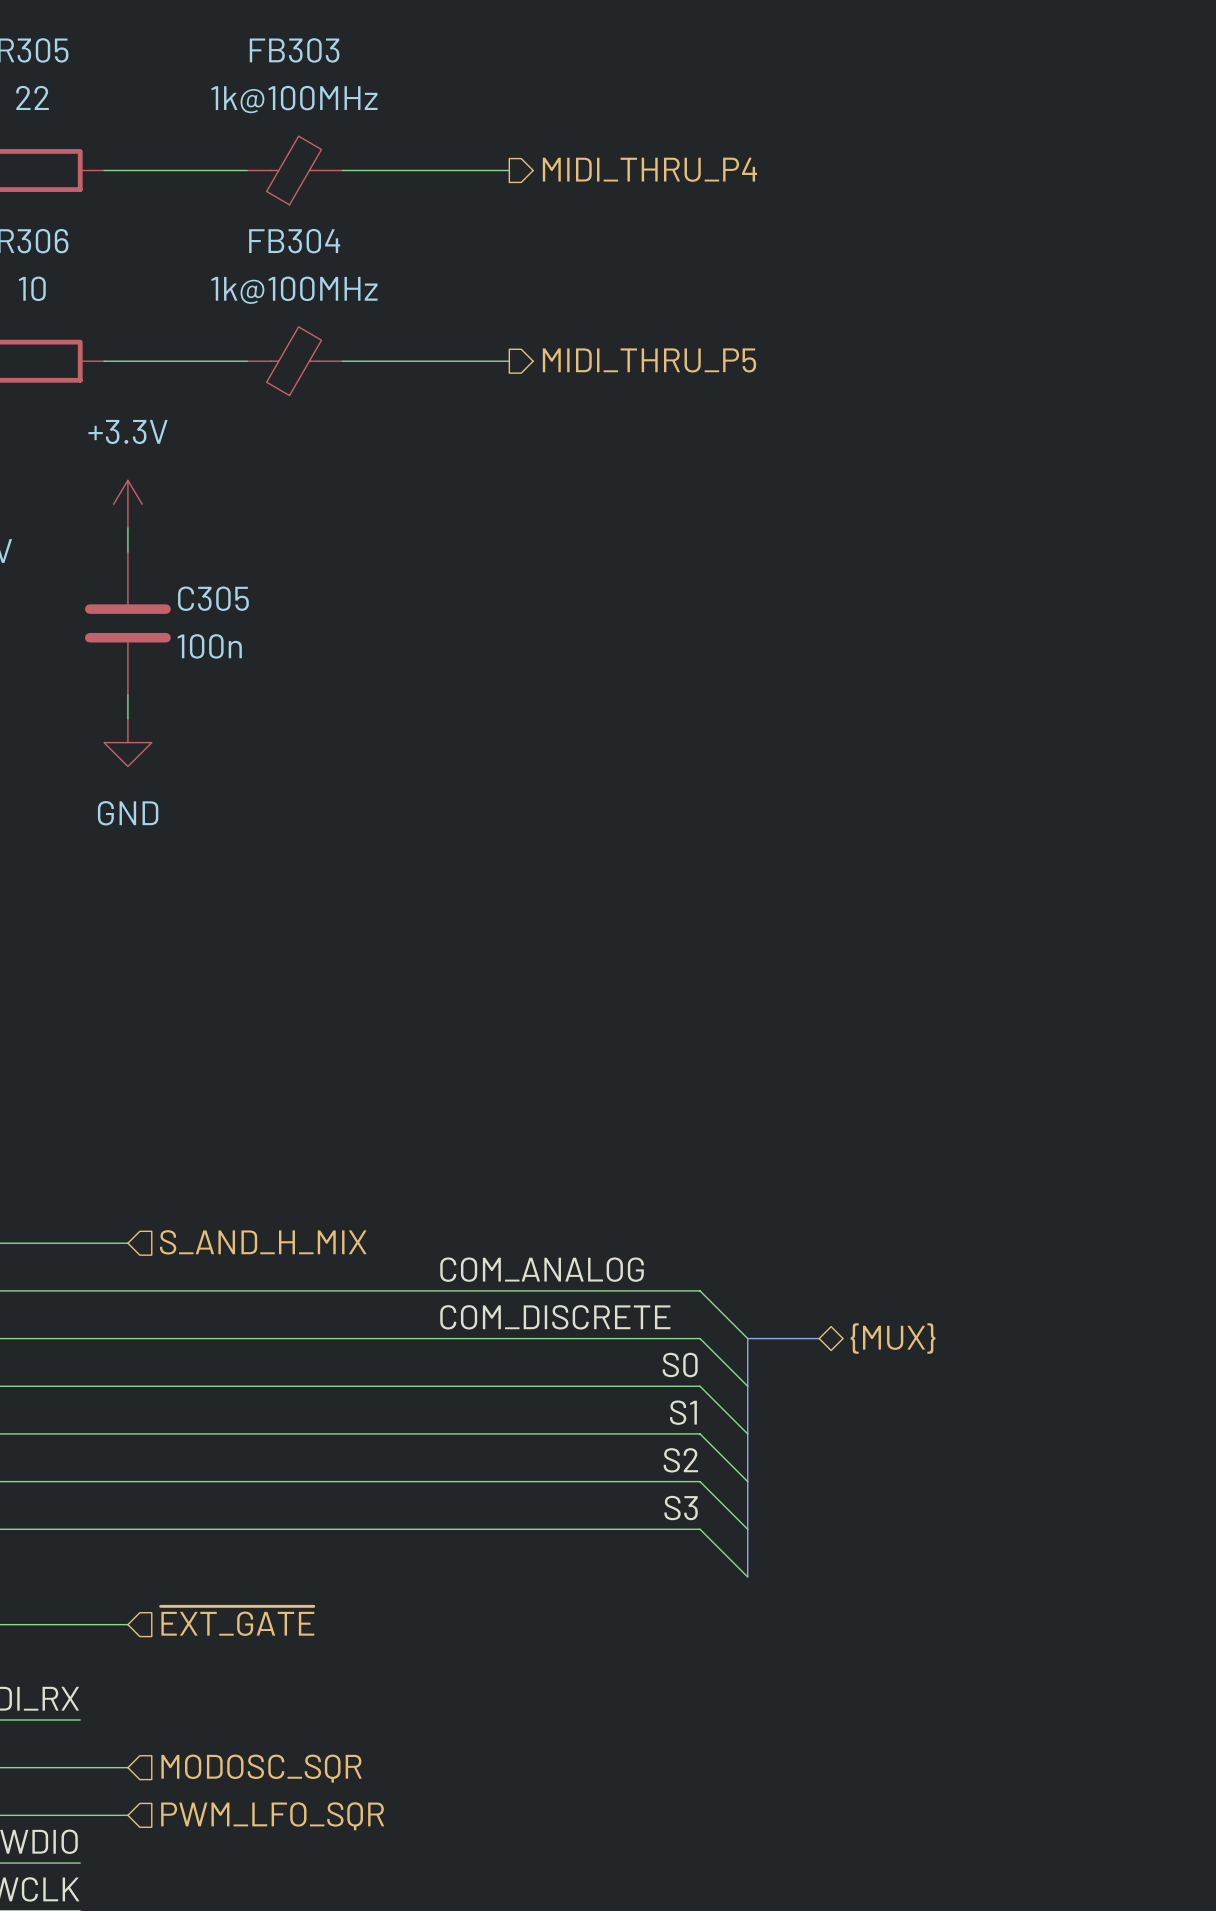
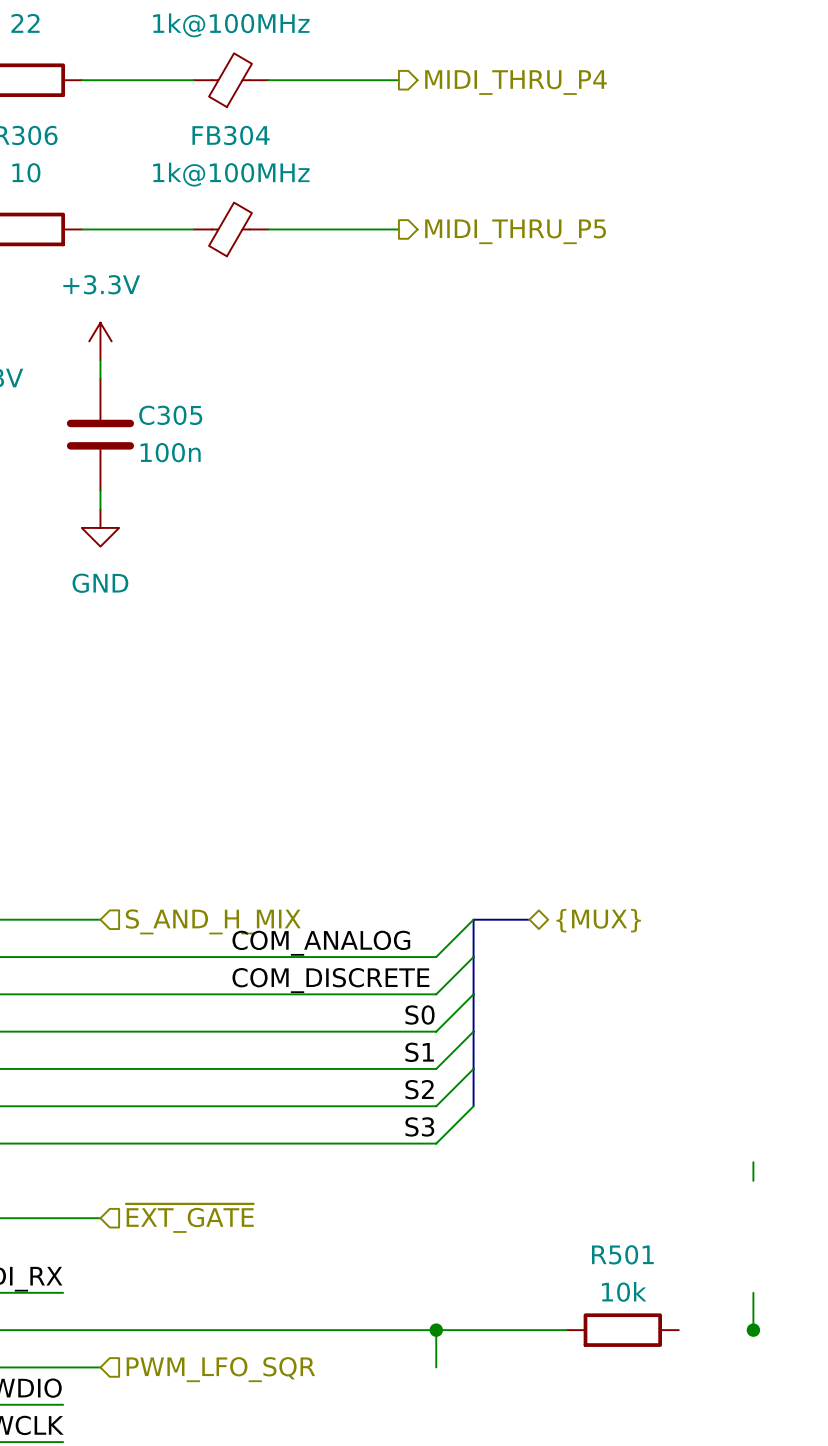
label position: COM_ANALOG (542, 1269) -> COM_ANALOG (321, 943)
wire: (557, 1290) (700, 1290) (747, 1338) -> (436, 957) (473, 919)
label position: COM_DISCRETE (555, 1317) -> COM_DISCRETE (330, 980)
wire: (557, 1338) (700, 1338) (747, 1386) -> (436, 994) (473, 957)
bus: (819, 1338) (747, 1338) (747, 1576) -> (529, 919) (473, 919) (473, 1106)
hierarchical label position: {MUX} (893, 1338) -> {MUX} (598, 920)
label position: S0 (680, 1365) -> S0 (419, 1015)
wire: (557, 1386) (700, 1386) (747, 1433) -> (436, 1031) (473, 994)
label position: S1 (683, 1412) -> S1 (419, 1052)
wire: (557, 1433) (700, 1433) (747, 1481) -> (436, 1068) (473, 1031)
label position: S2 (680, 1460) -> S2 (419, 1089)
wire: (557, 1481) (700, 1481) (747, 1529) -> (436, 1106) (473, 1068)
label position: S3 (681, 1508) -> S3 (419, 1126)
wire: (557, 1529) (700, 1529) (747, 1576) -> (436, 1143) (473, 1106)
wire: none -> (753, 1162) (753, 1180)
wire: none -> (753, 1292) (753, 1330)
wire: none -> (100, 1330) (566, 1330)
wire: none -> (436, 1330) (436, 1367)
junction: none -> (436, 1330)
R501: none -> 10k (622, 1330)
junction: none -> (753, 1330)
hierarchical label: MODOSC_SQR (261, 1768) -> none

